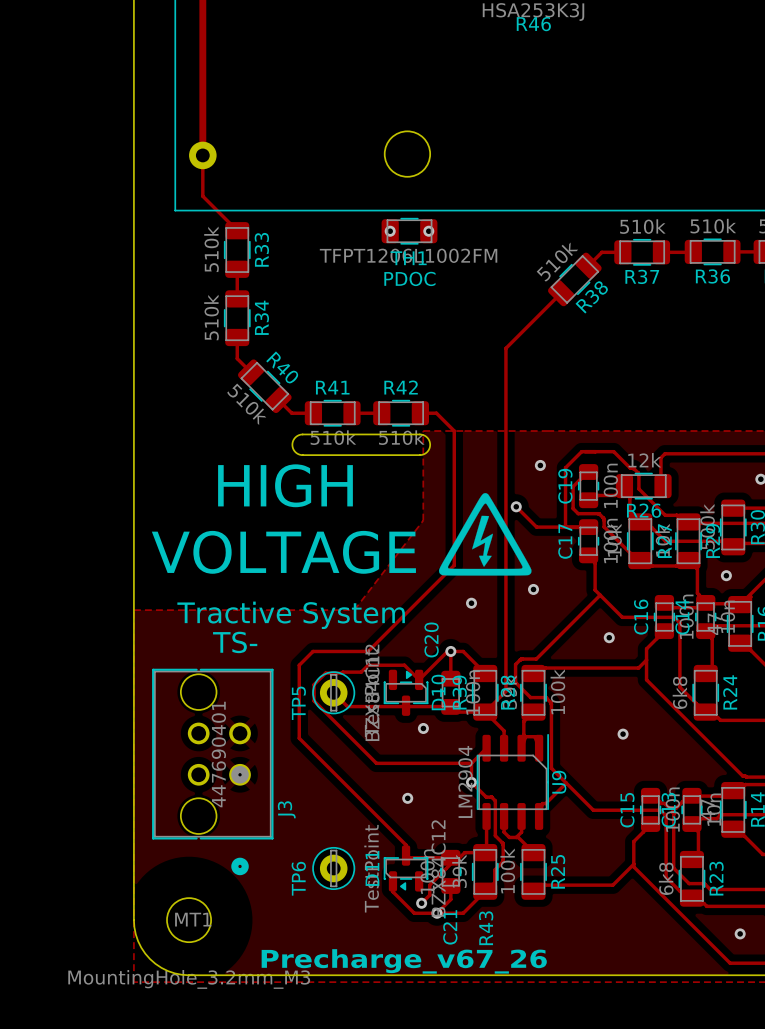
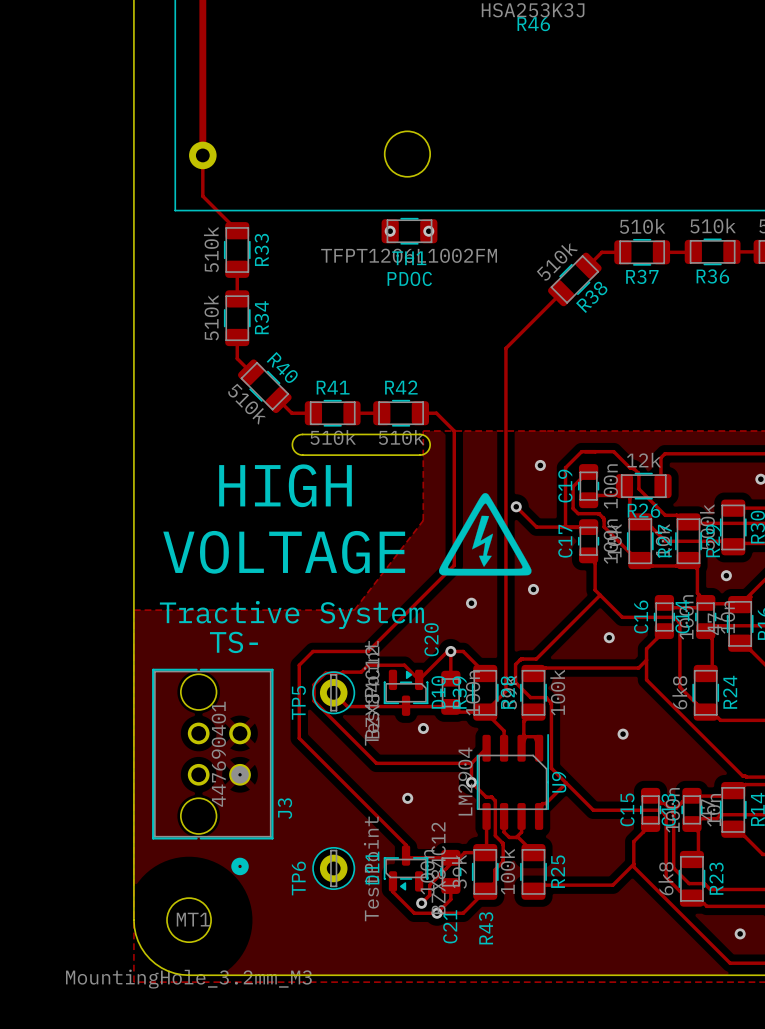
text: Precharge_v67_26 (404, 961) -> none

